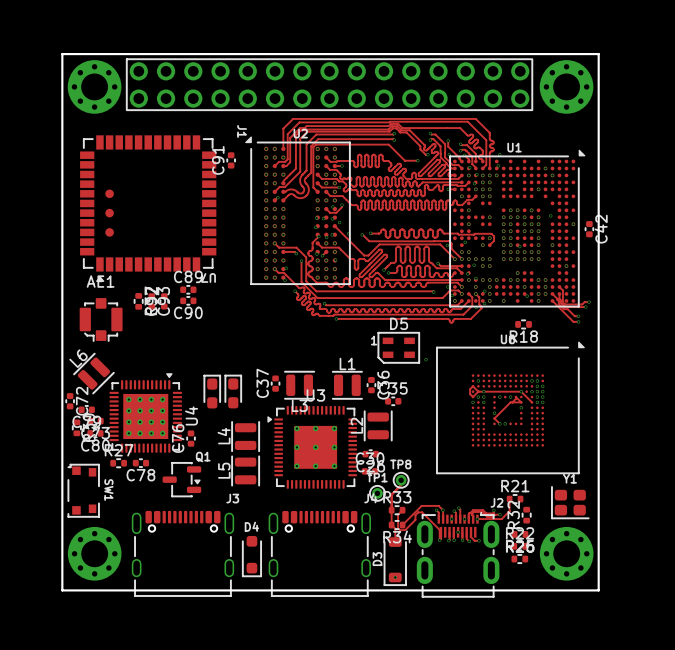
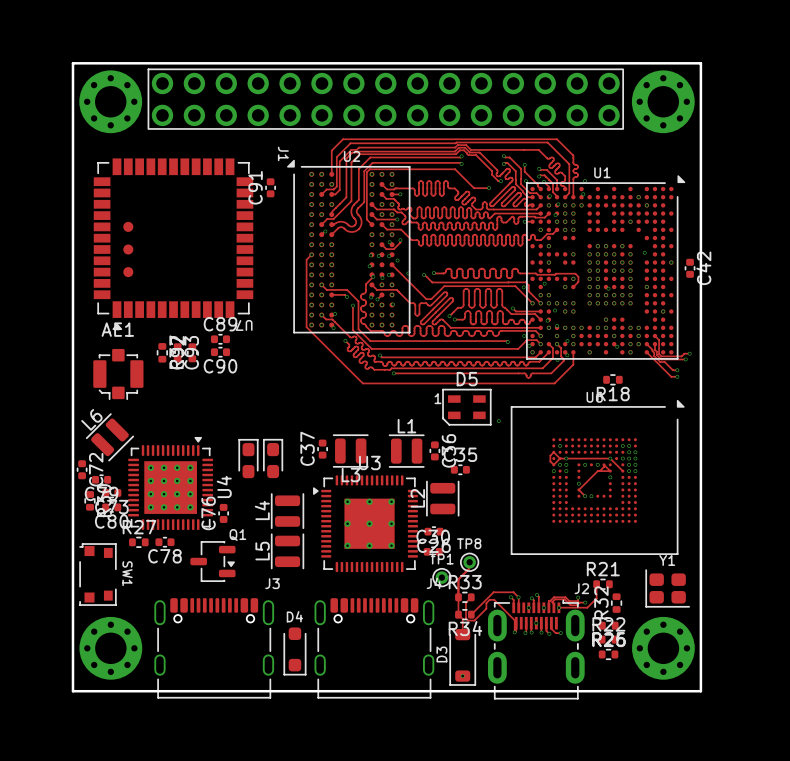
track: none -> (311, 254) (306, 259) (306, 327) (362, 383) (554, 383) (573, 364) (573, 352)
via: (489, 300) -> none

